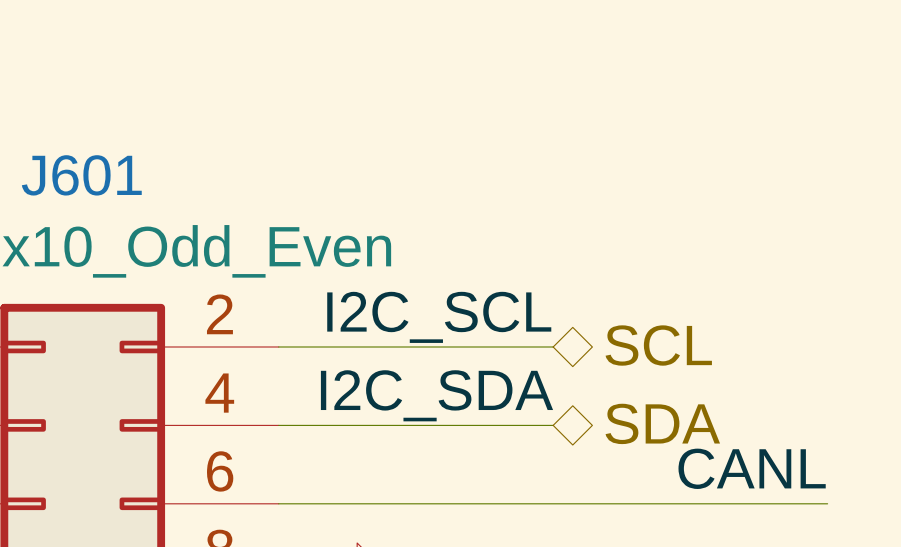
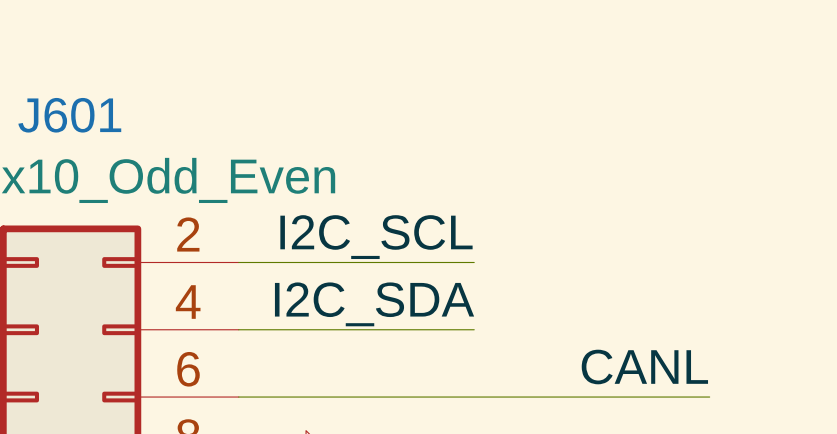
hierarchical label: SCL (658, 345) -> none
hierarchical label: SDA (662, 423) -> none

